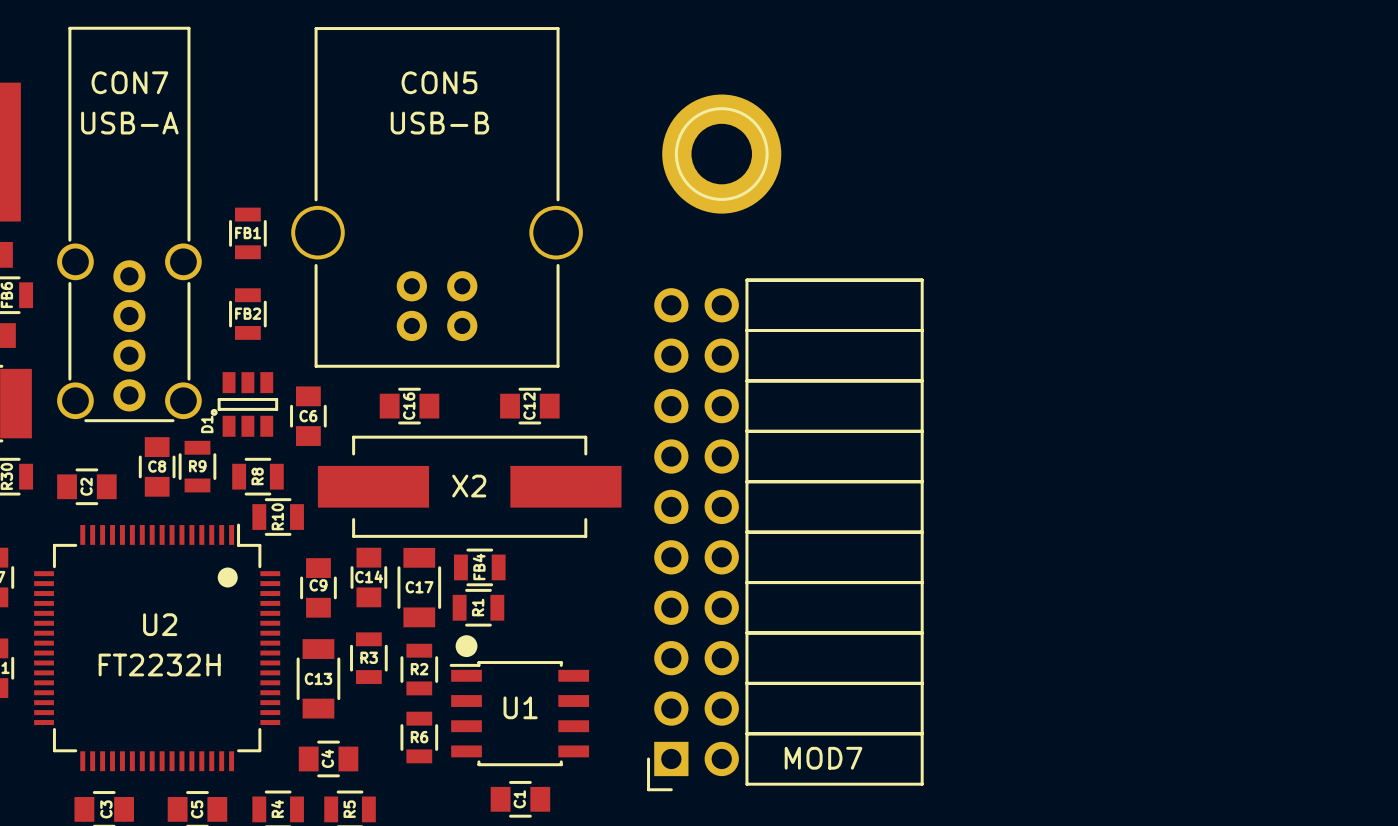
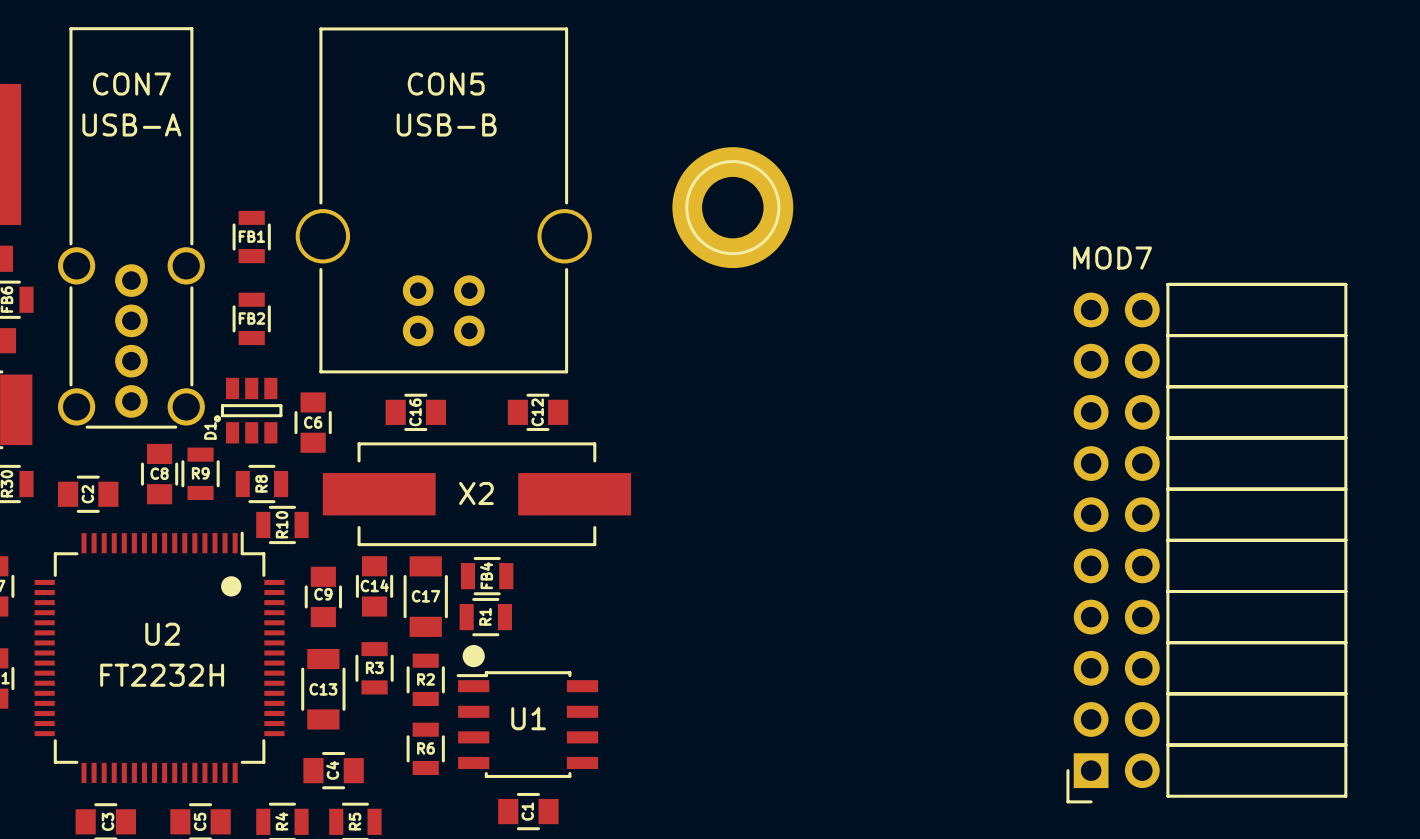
part position: (721, 154) -> (732, 207)
MOD7 position: (785, 534) -> (1206, 543)
MOD7 name position: MOD7 (823, 758) -> MOD7 (1112, 258)

